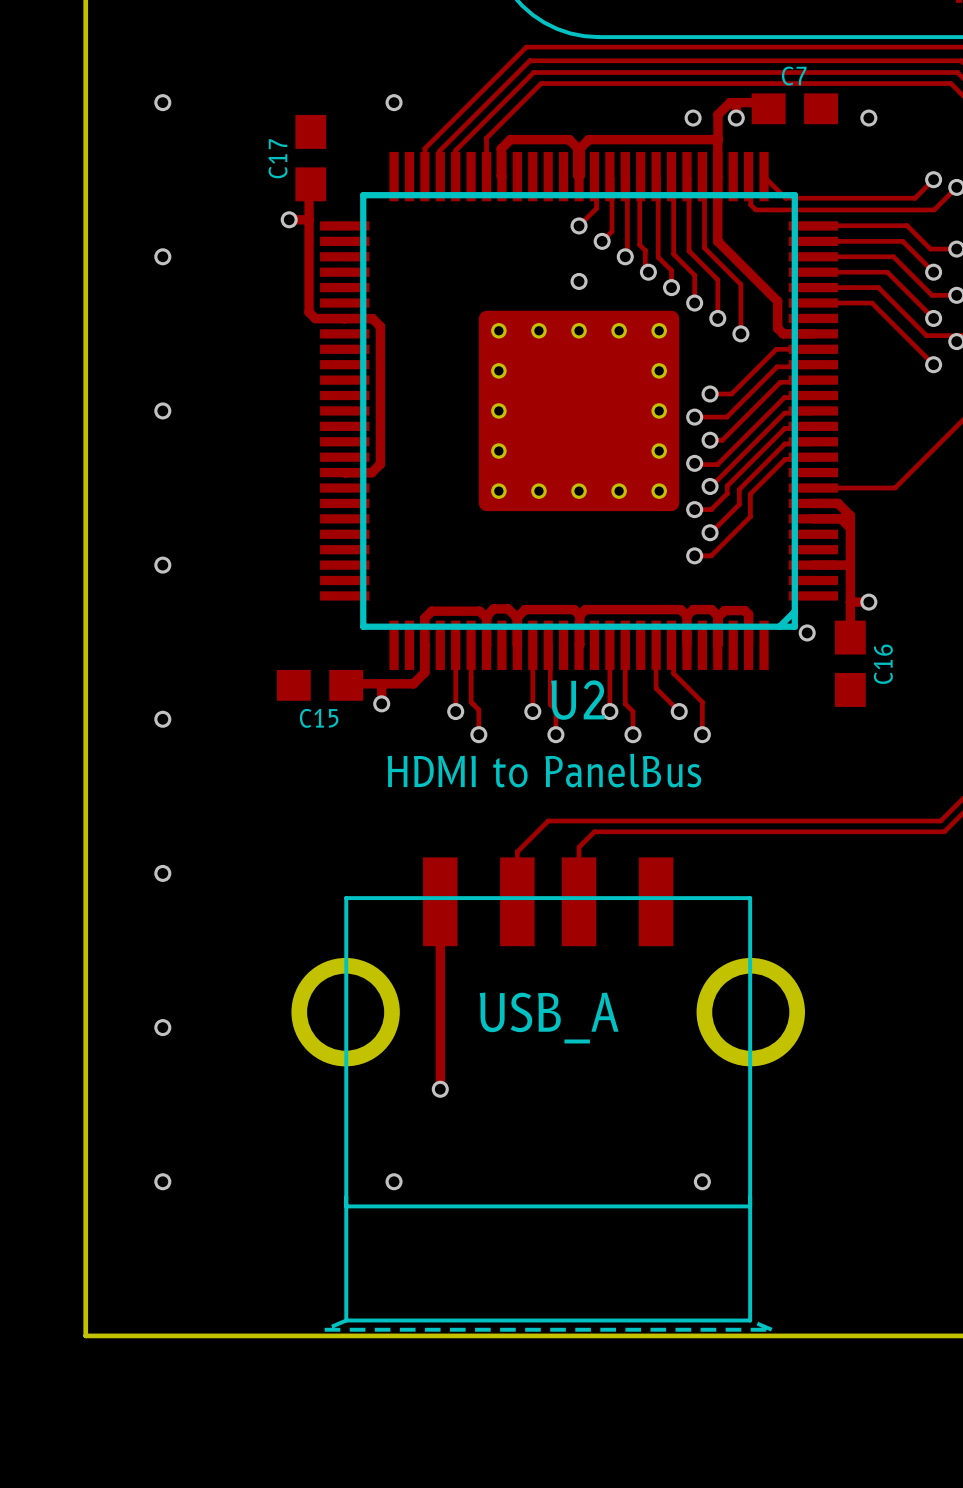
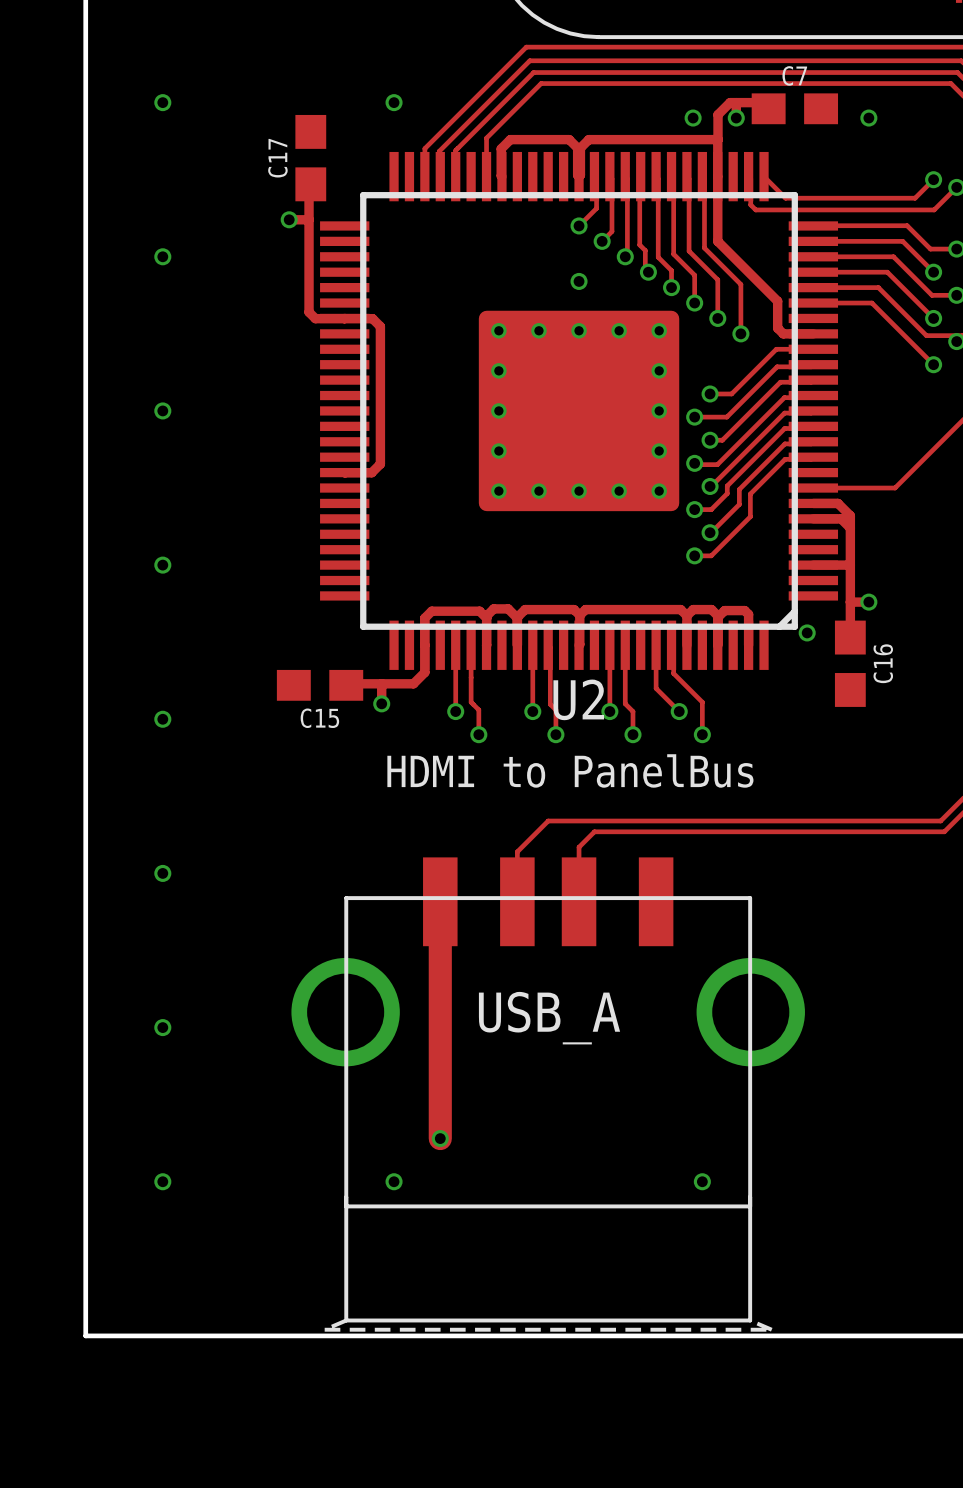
track width: thin (440, 901) (440, 1089) -> thick (440, 901) (440, 1089)
track: none -> (440, 1089) (440, 1138)
via position: (440, 1089) -> (440, 1138)

